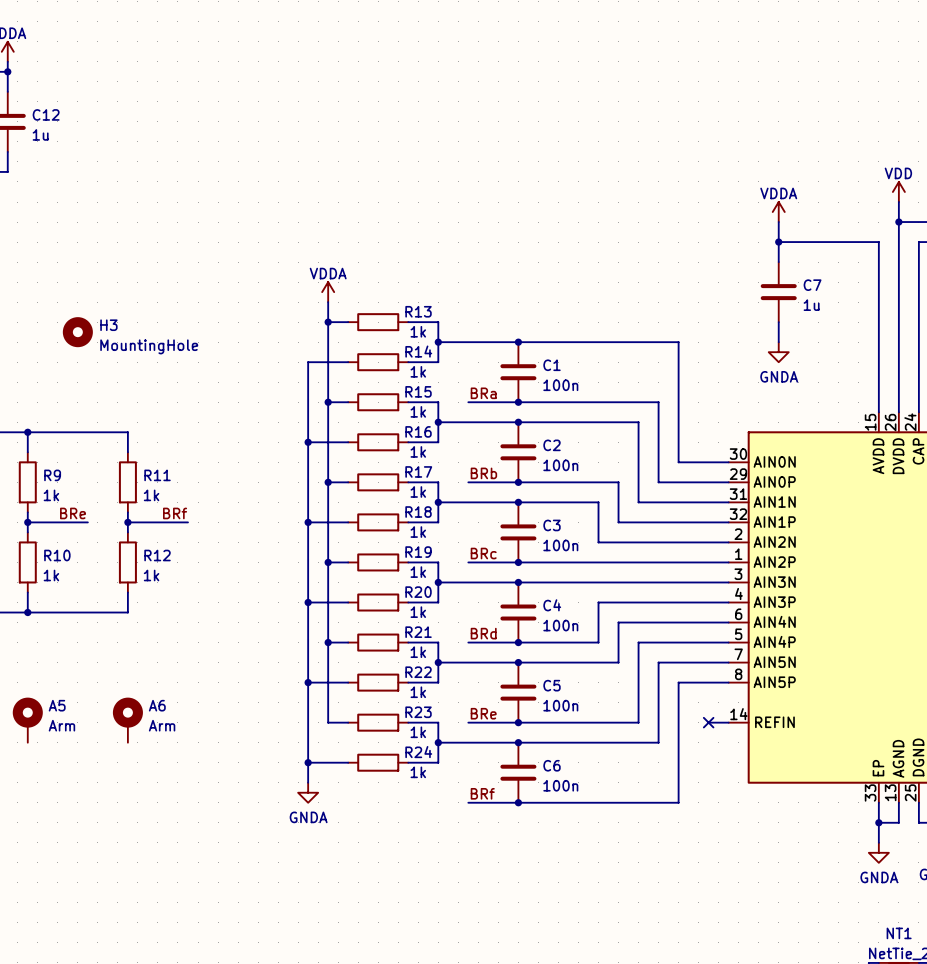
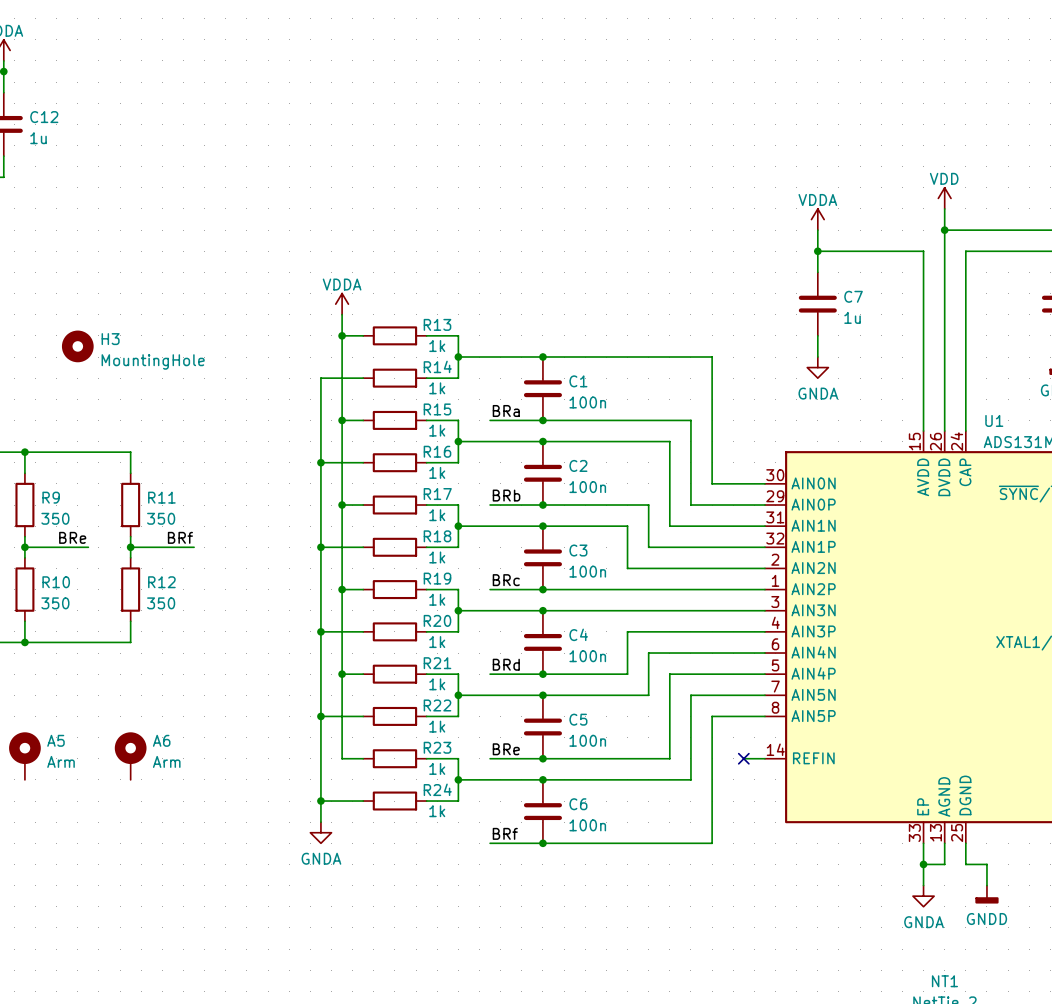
R9 value: 1k (51, 495) -> 350 (55, 518)
R11 value: 1k (151, 495) -> 350 (161, 518)
R10 value: 1k (51, 575) -> 350 (55, 603)
R12 value: 1k (151, 575) -> 350 (161, 603)

